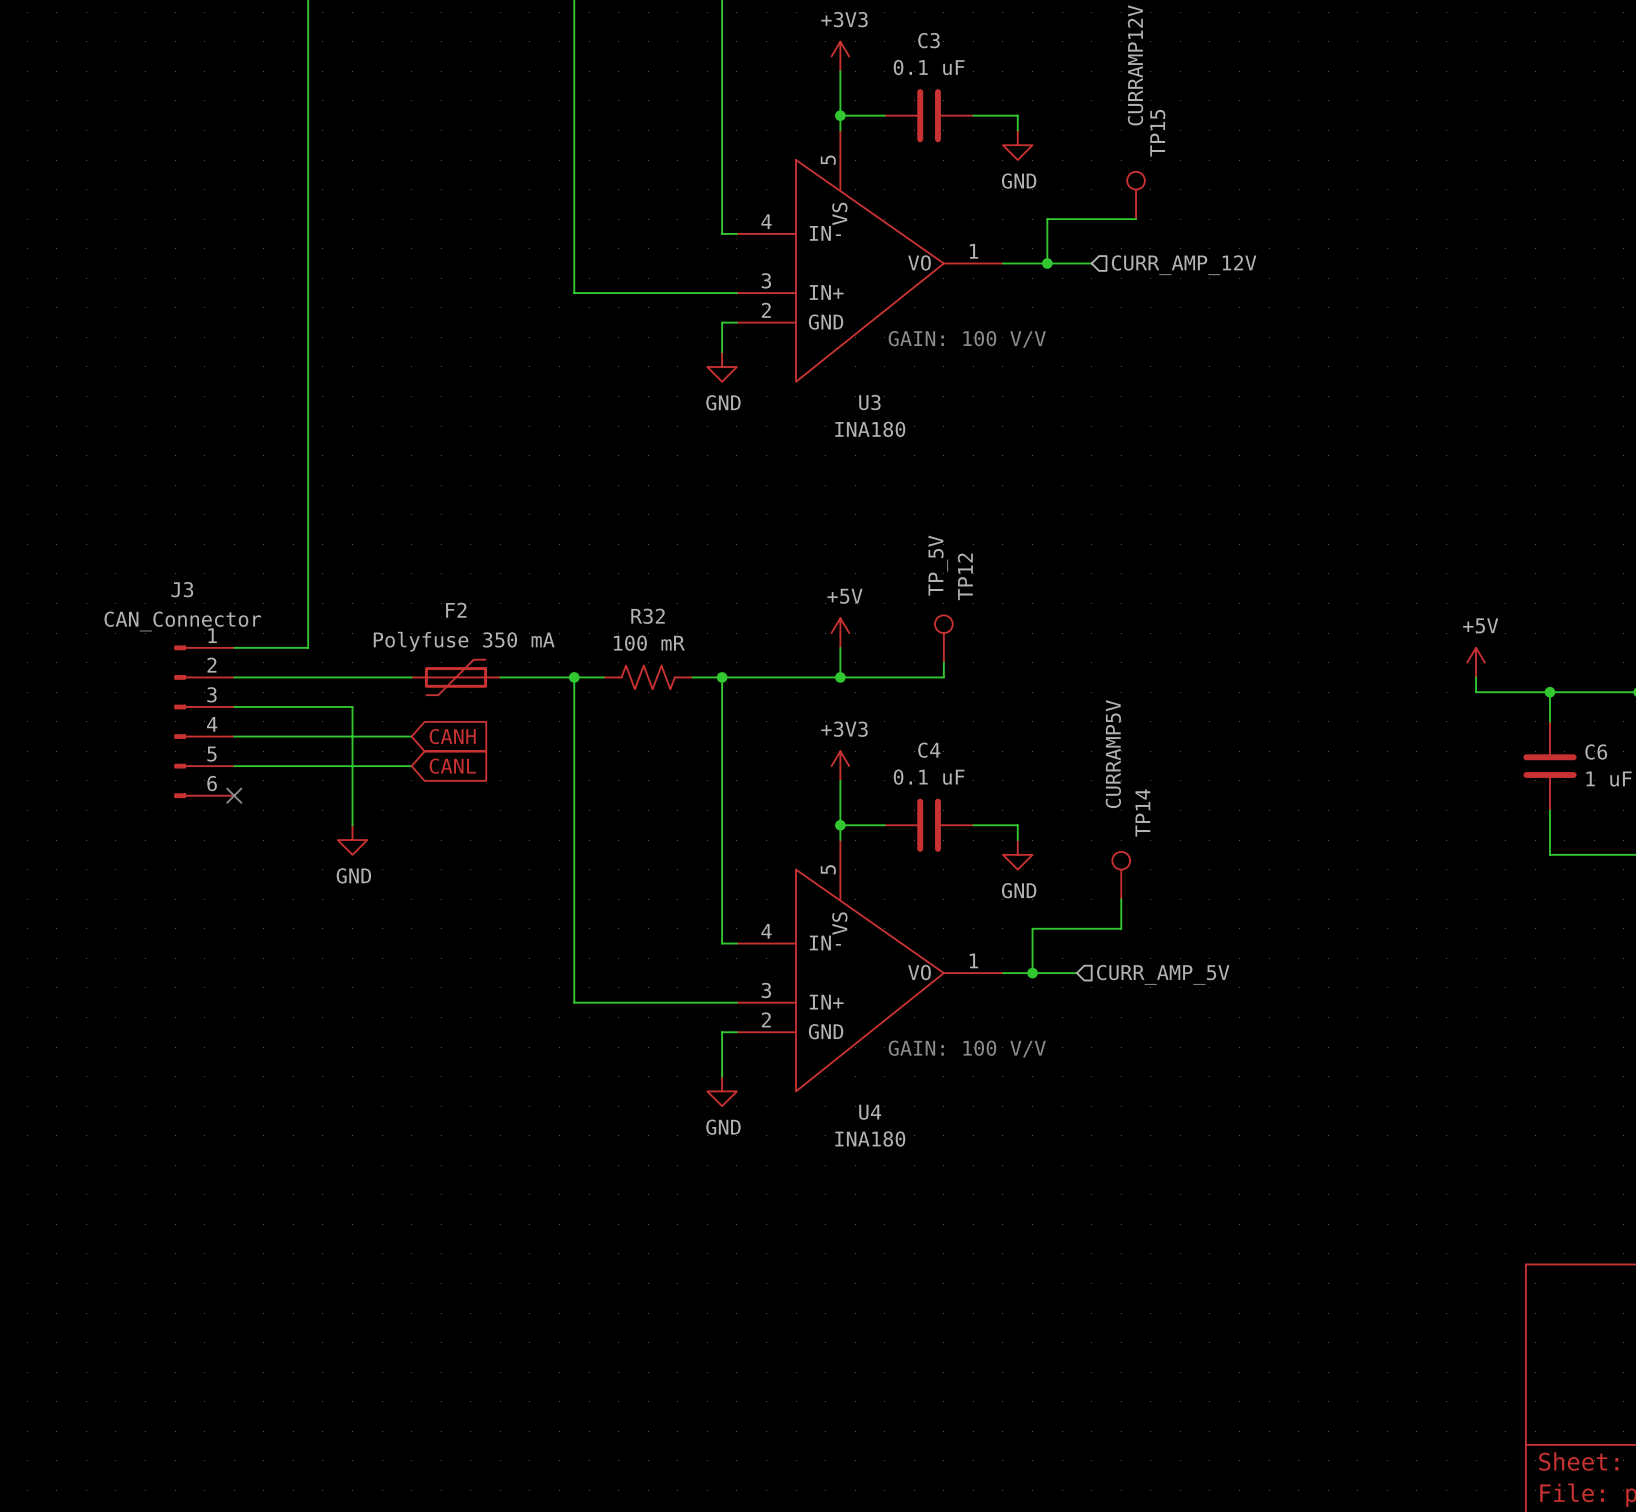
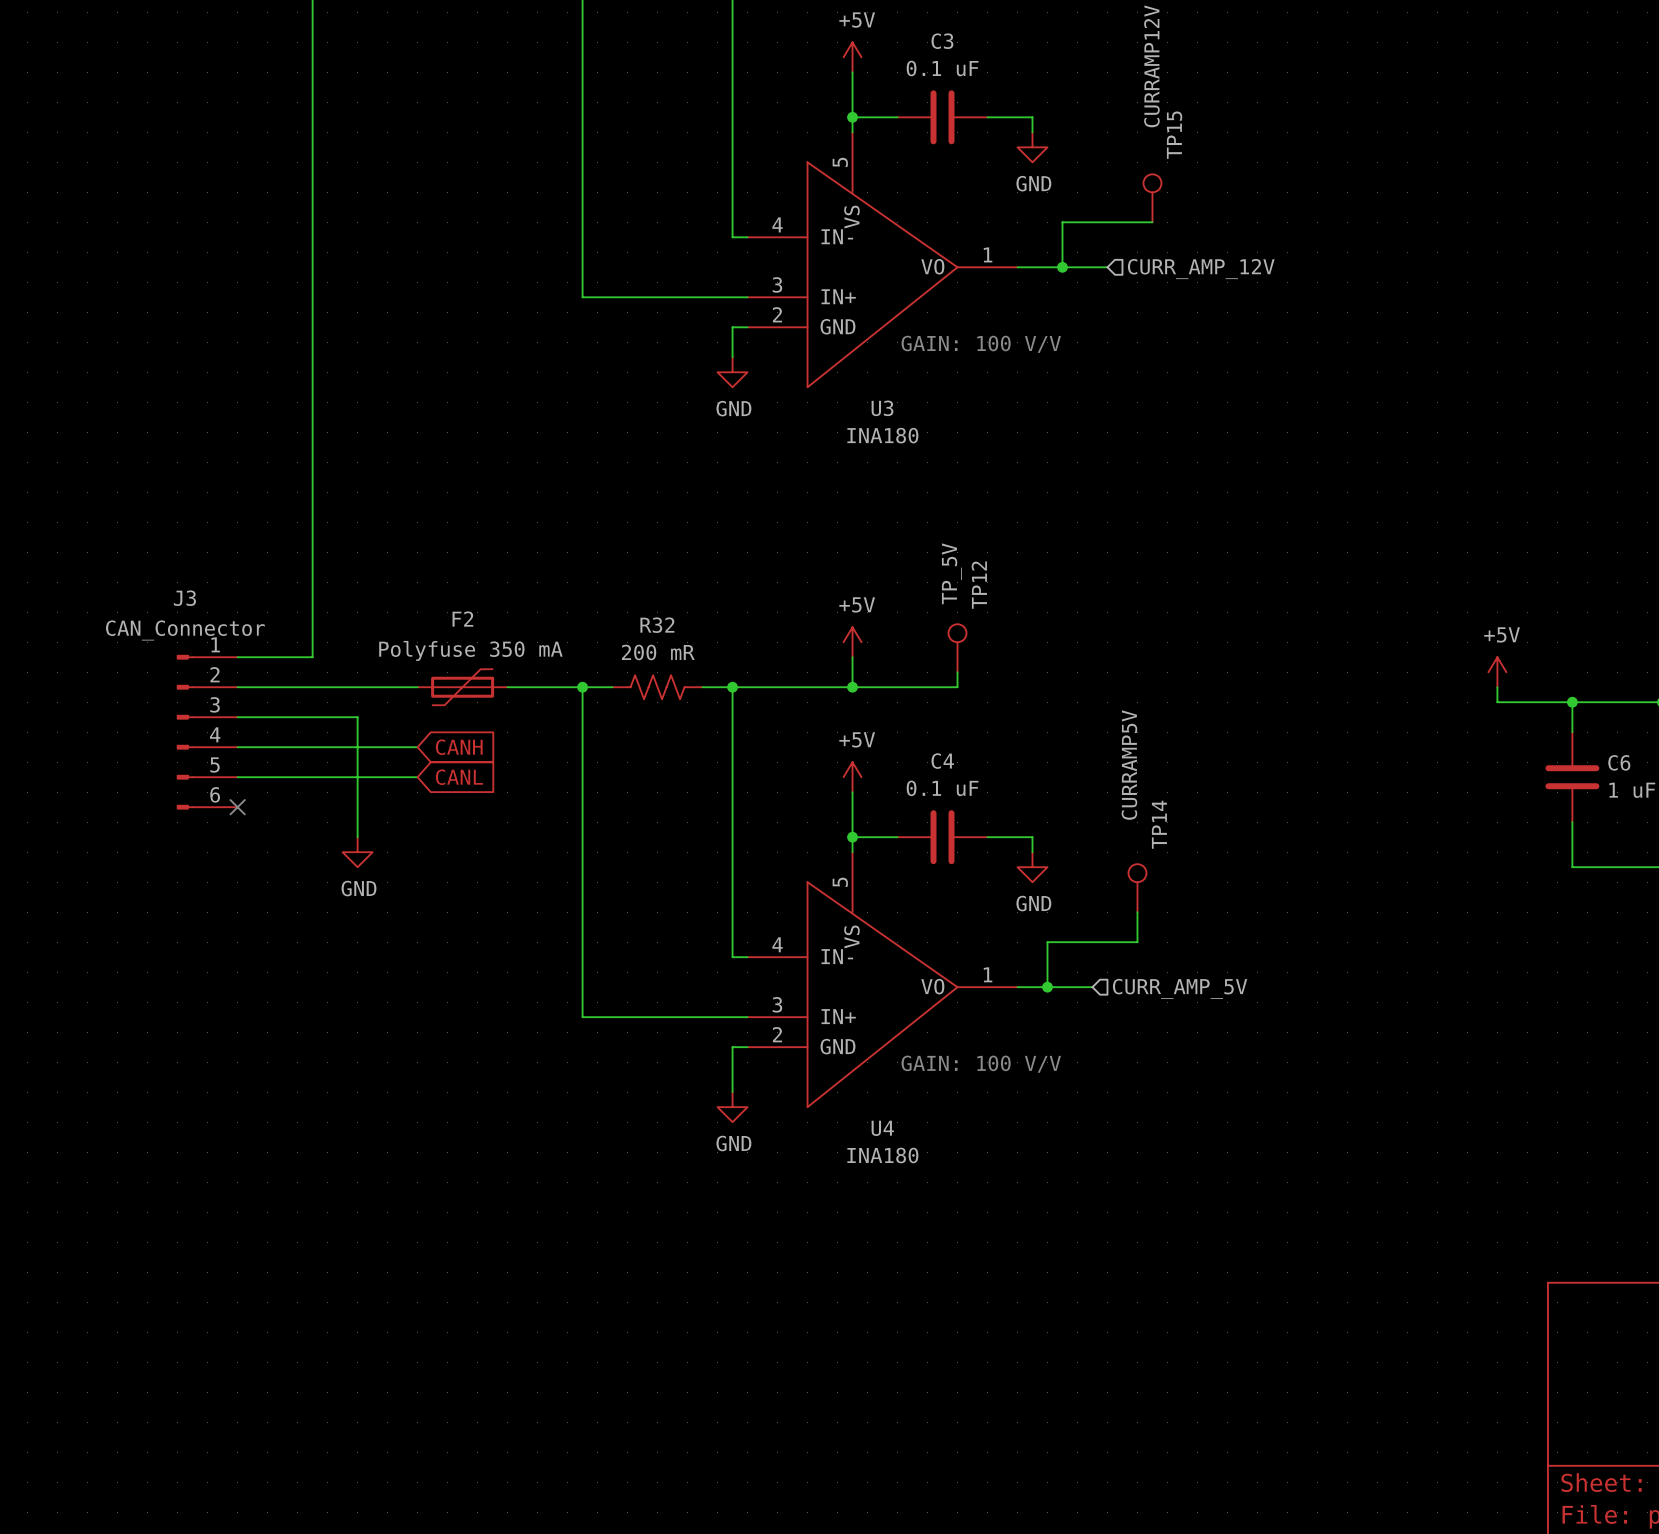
power symbol: +3V3 (840, 56) -> +5V (852, 57)
R32 value: 100 mR (649, 643) -> 200 mR (658, 652)
power symbol: +3V3 (840, 766) -> +5V (852, 777)

